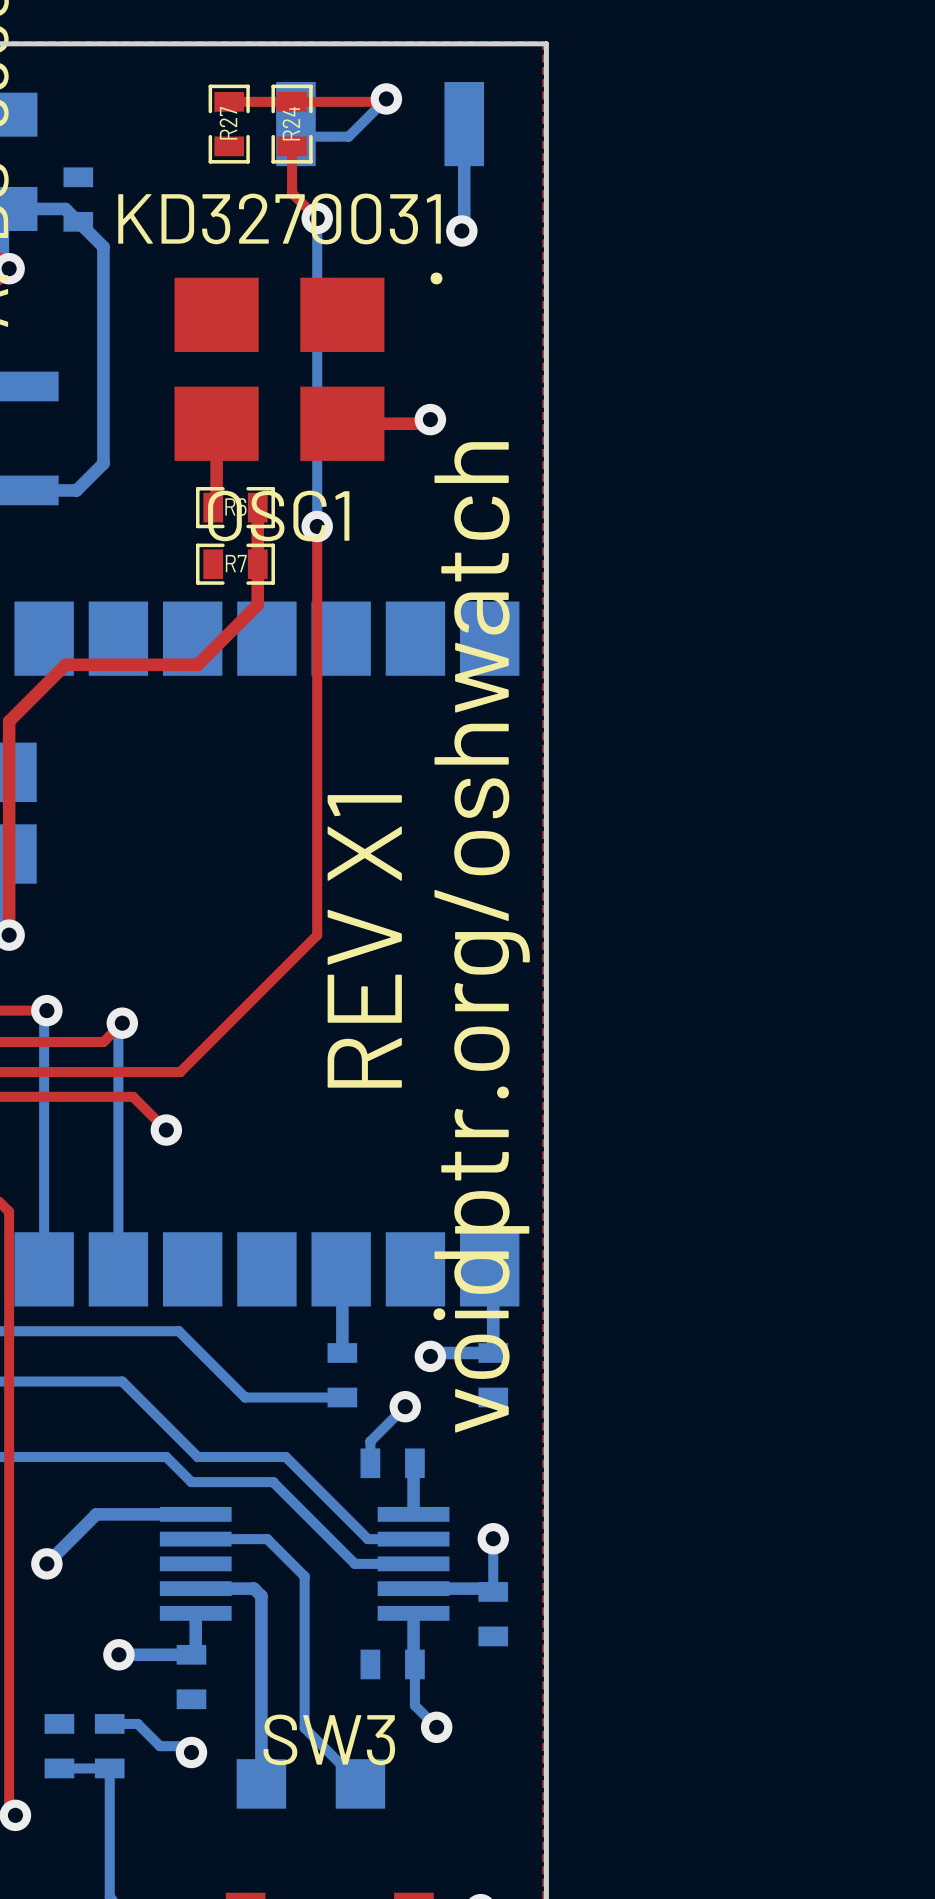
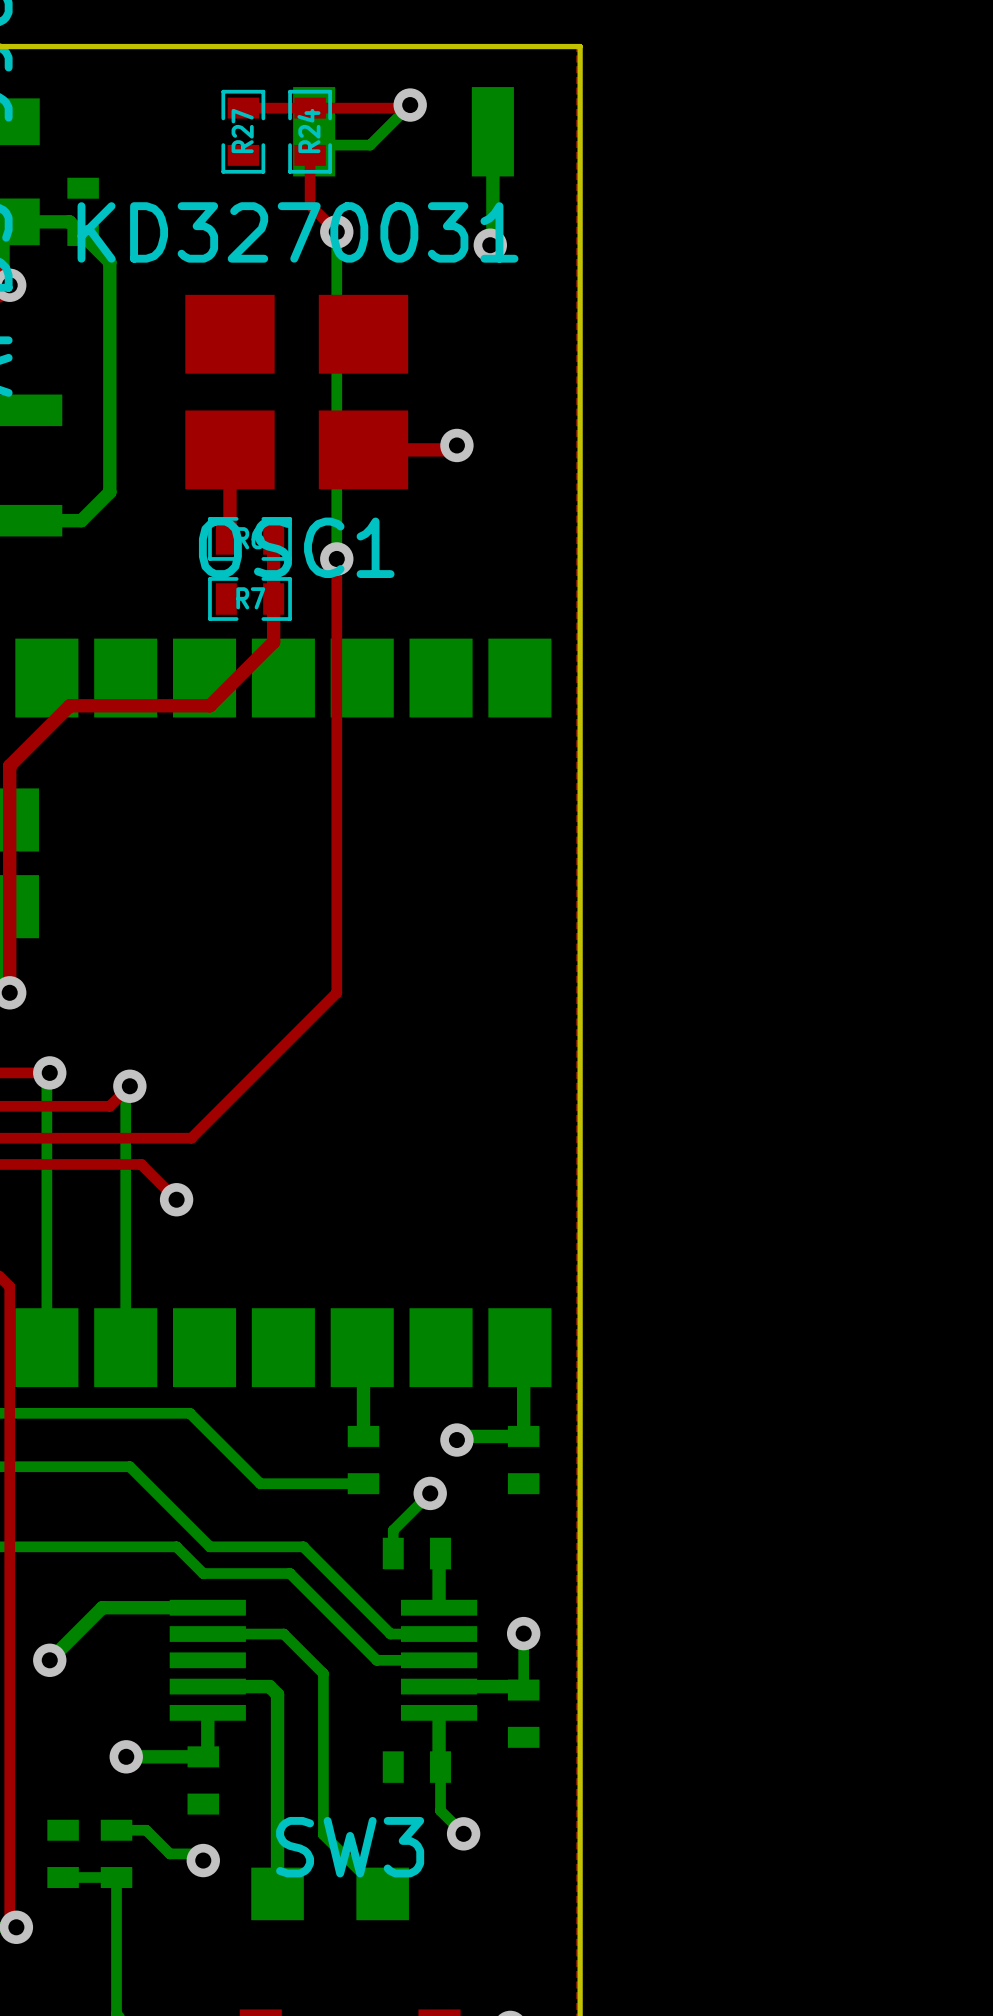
text: . (436, 278) -> none
text: voidptr.org/oshwatch (481, 937) -> none
text: REV X1 (364, 941) -> none

